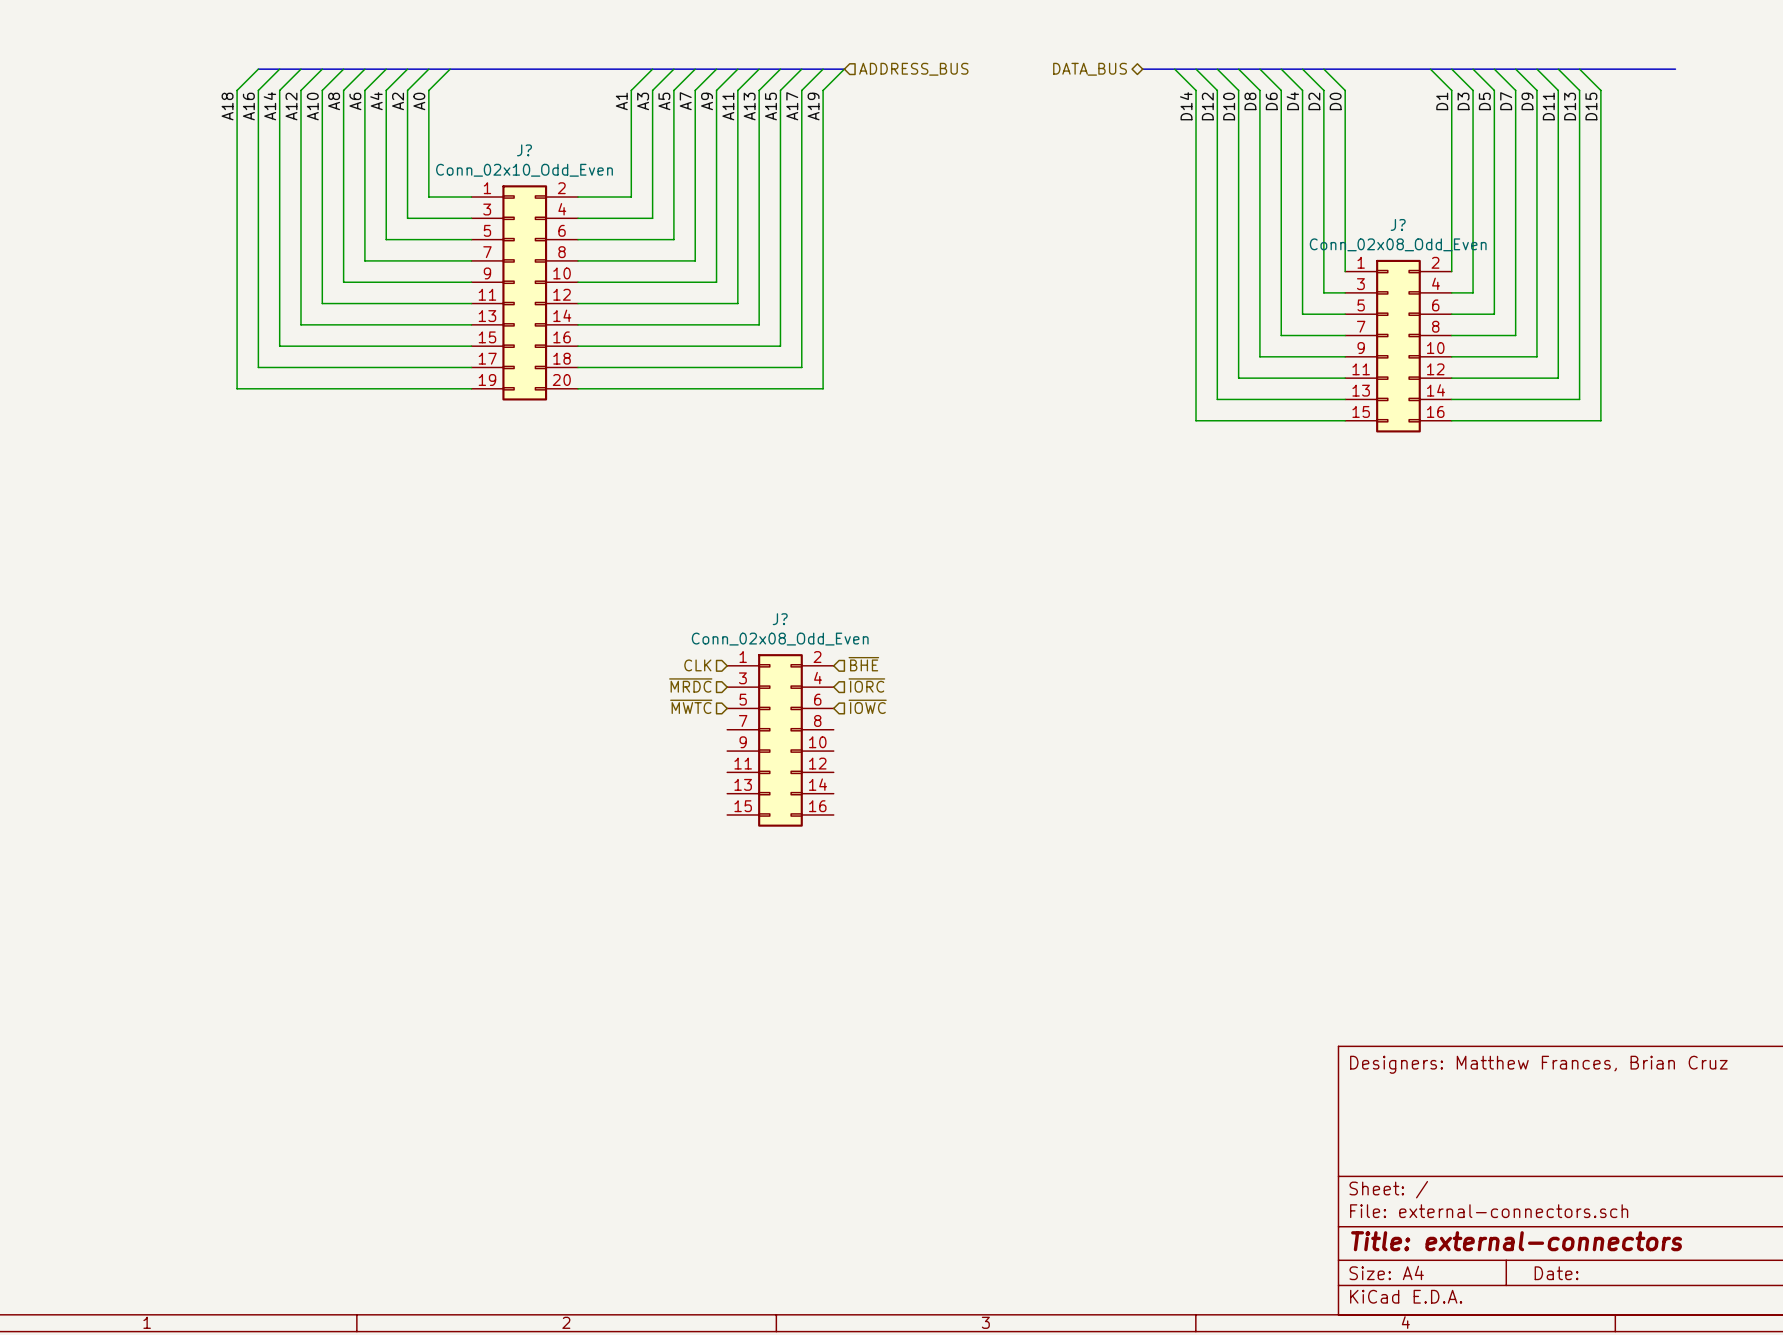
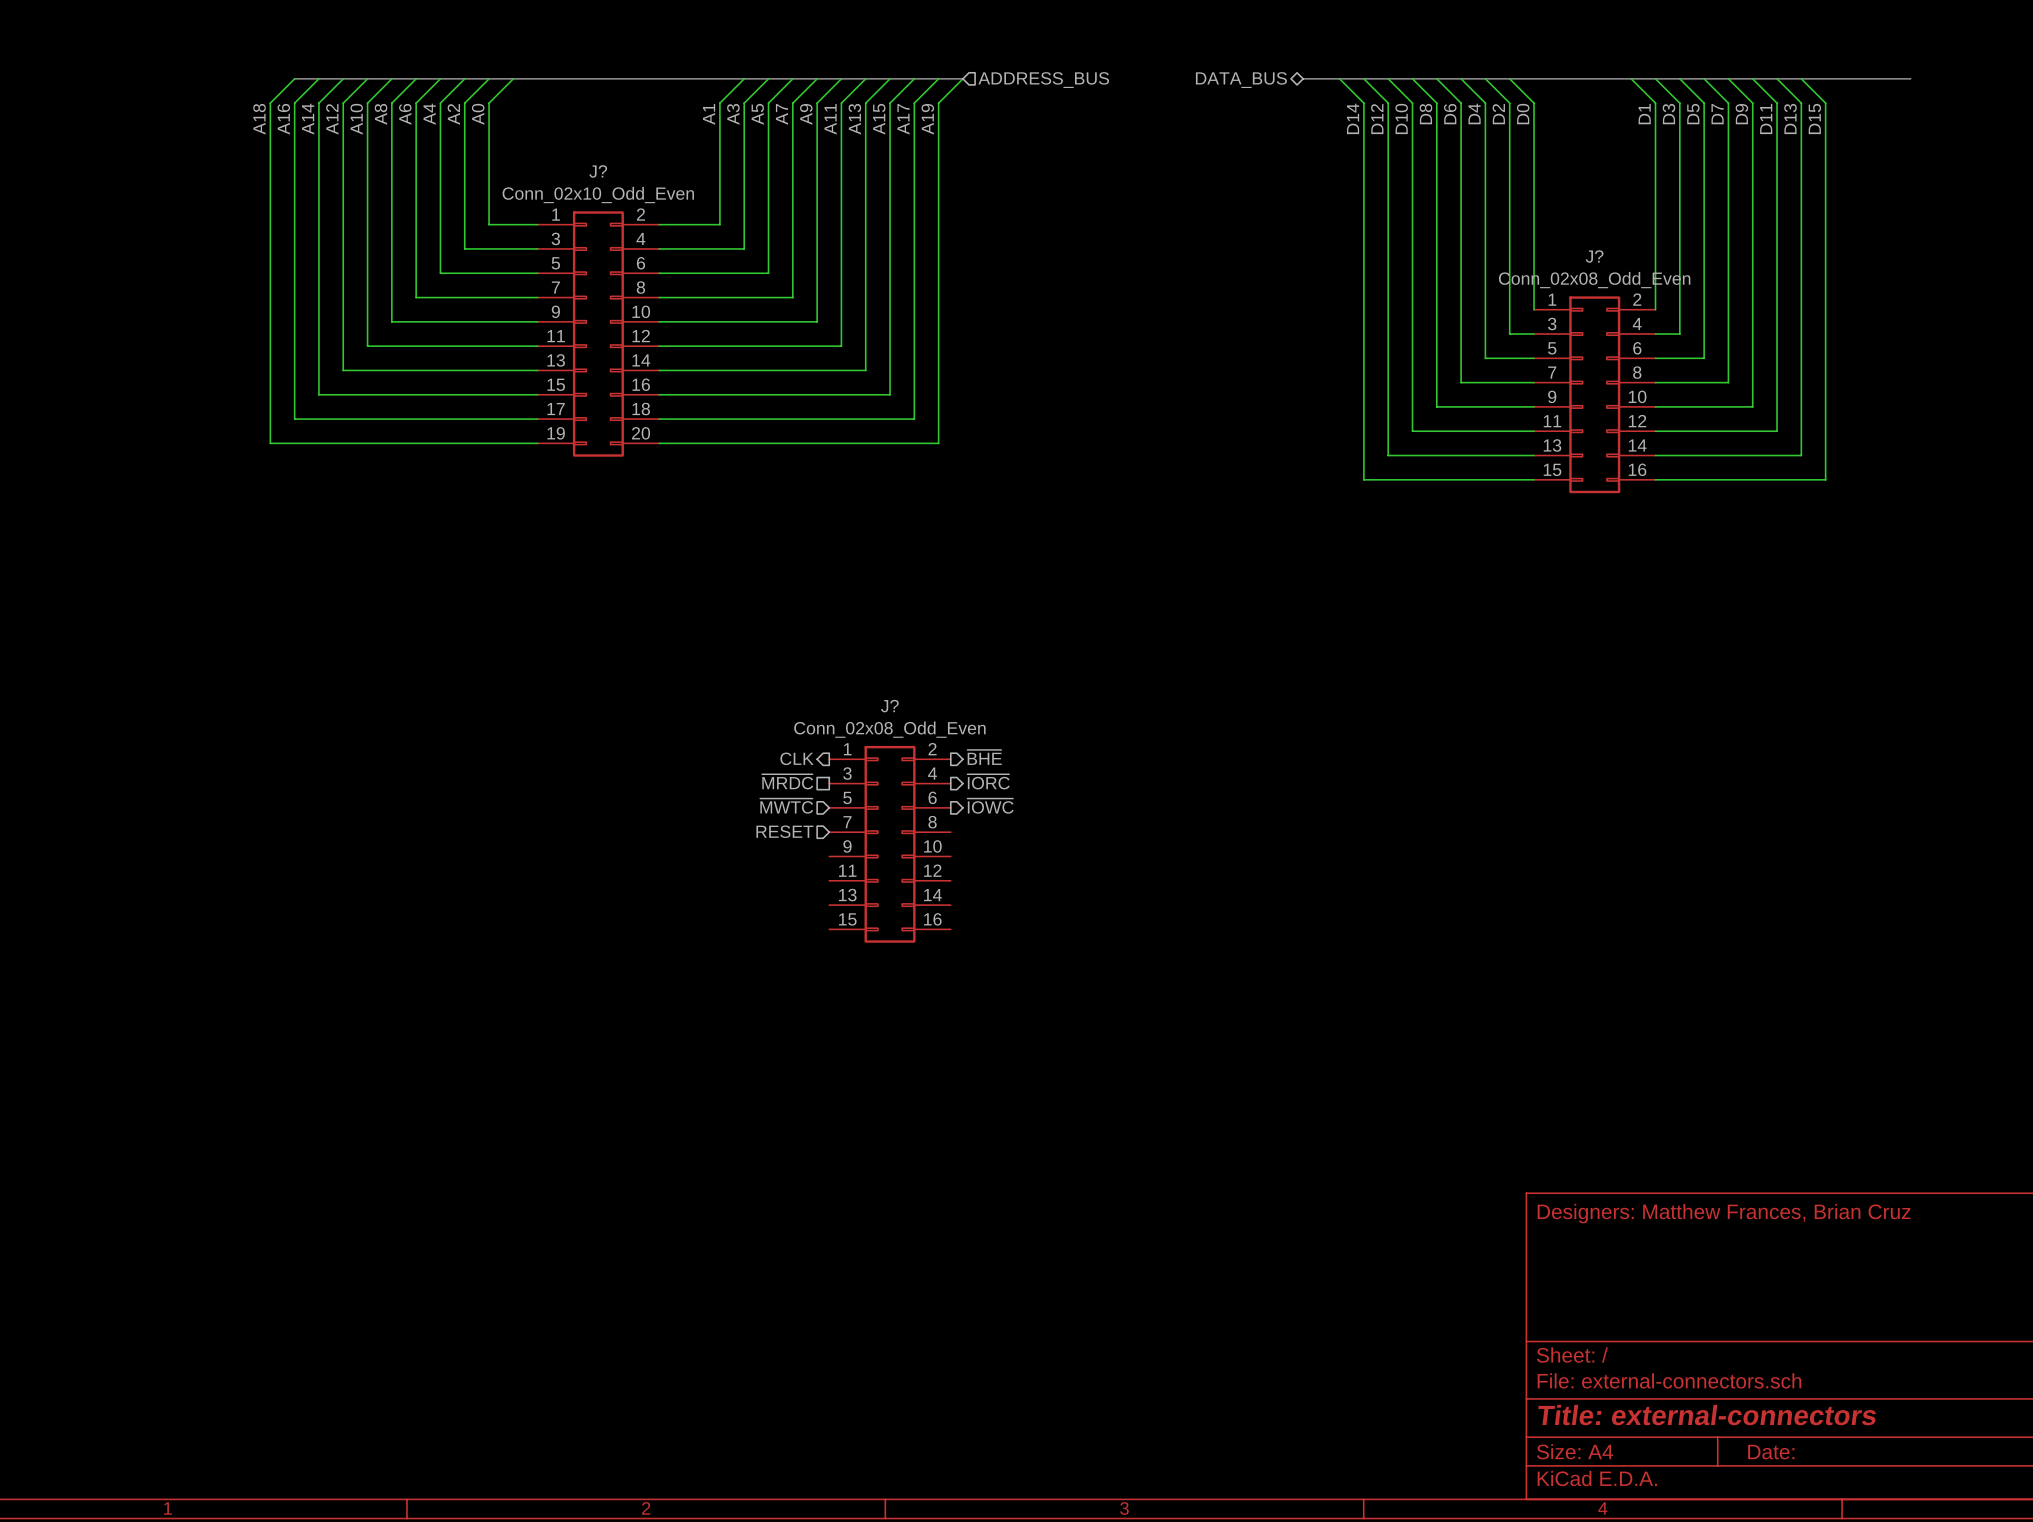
hierarchical label shape: input (863, 664) -> output (984, 757)
hierarchical label shape: input (697, 665) -> output (797, 758)
hierarchical label shape: input (690, 685) -> passive (787, 781)
hierarchical label shape: input (866, 685) -> output (988, 781)
hierarchical label shape: input (867, 706) -> output (990, 806)
hierarchical label: none -> RESET (784, 831)

